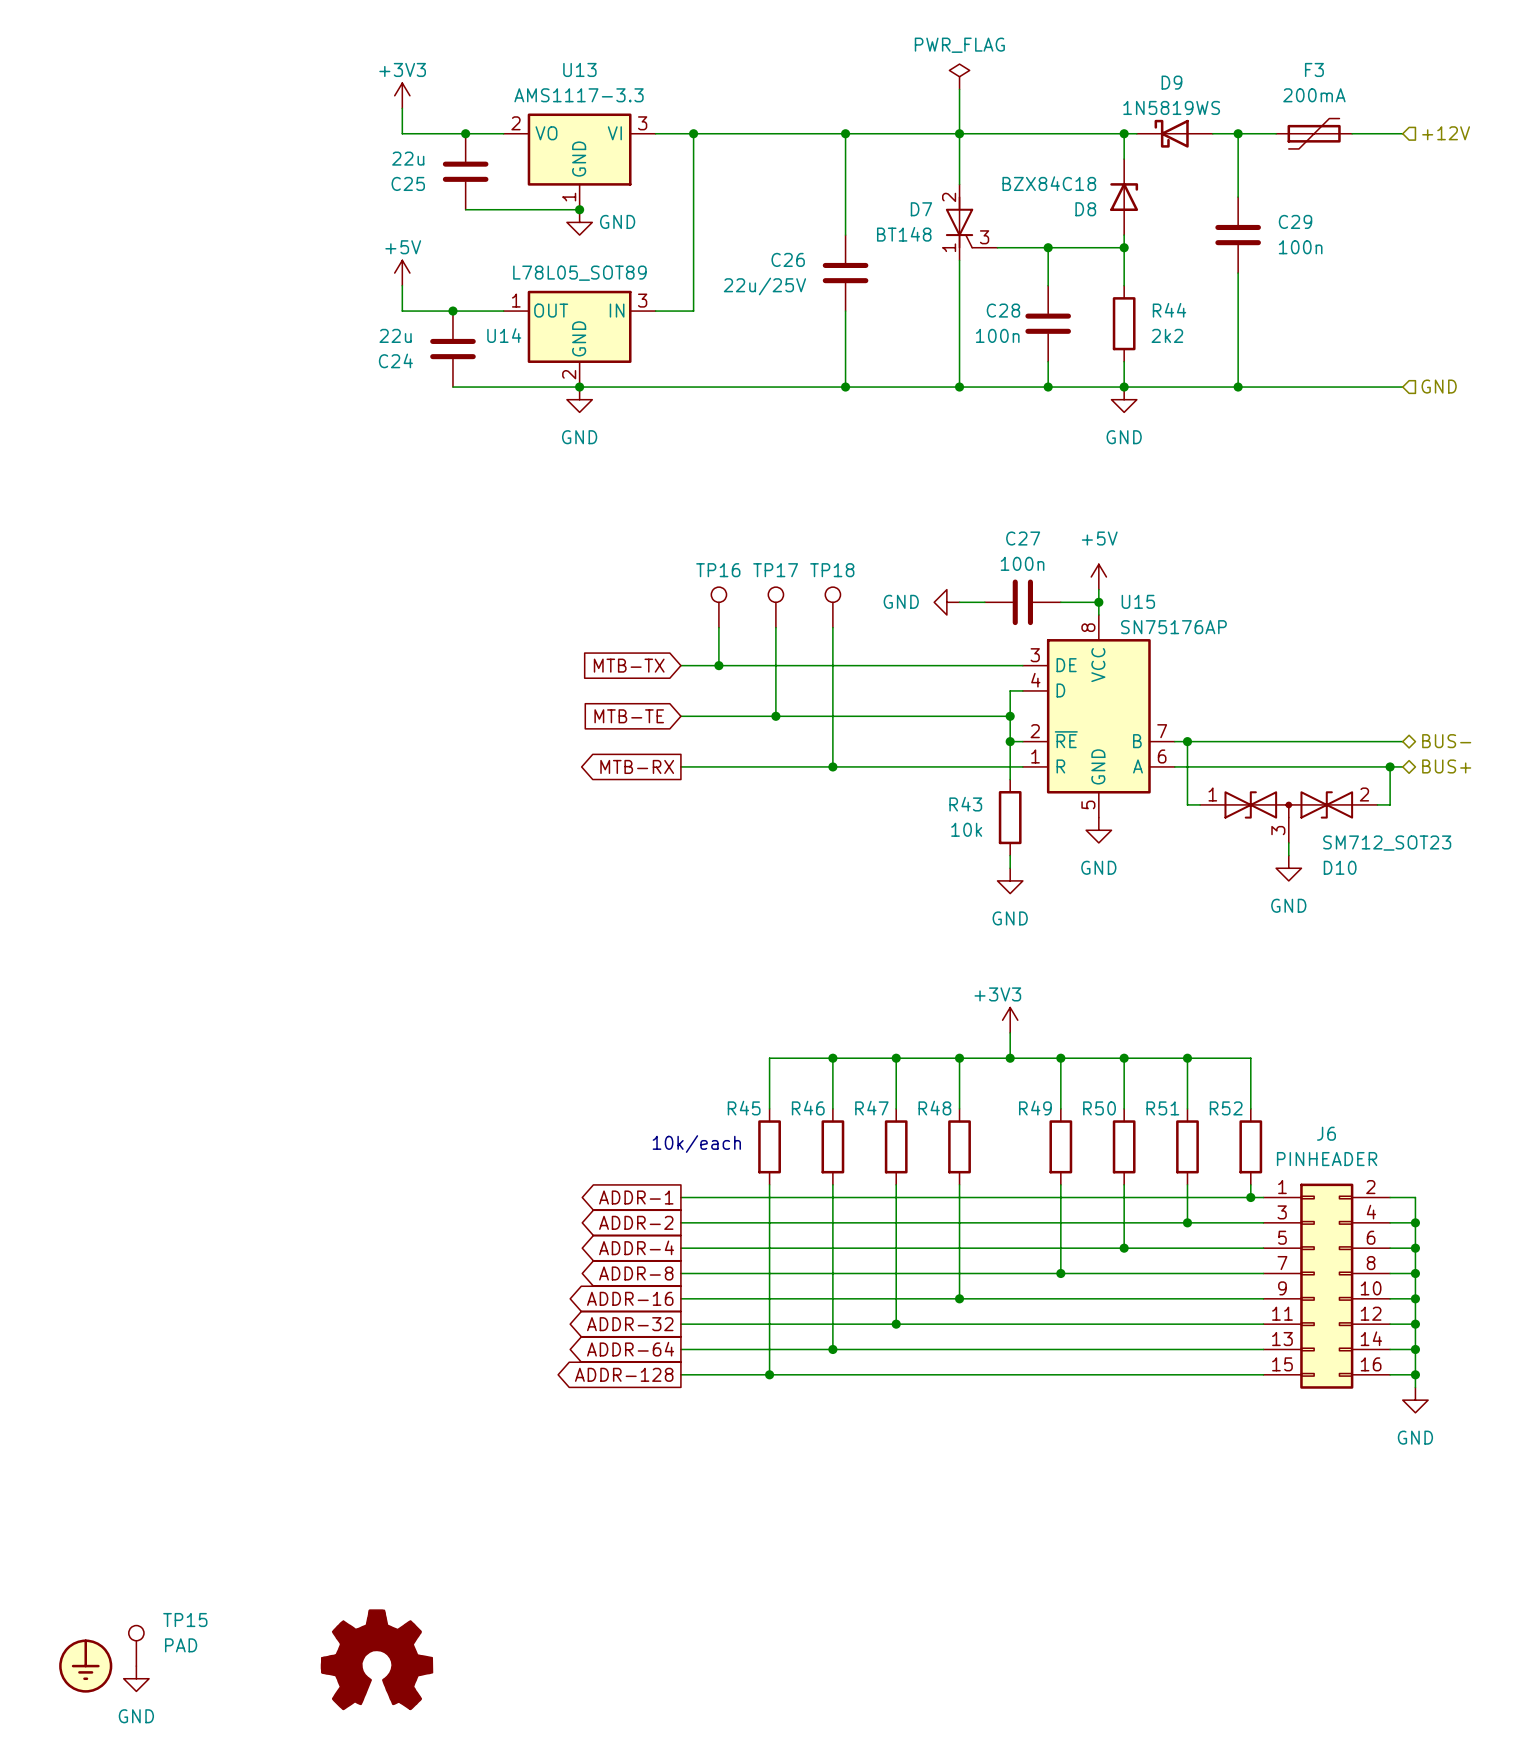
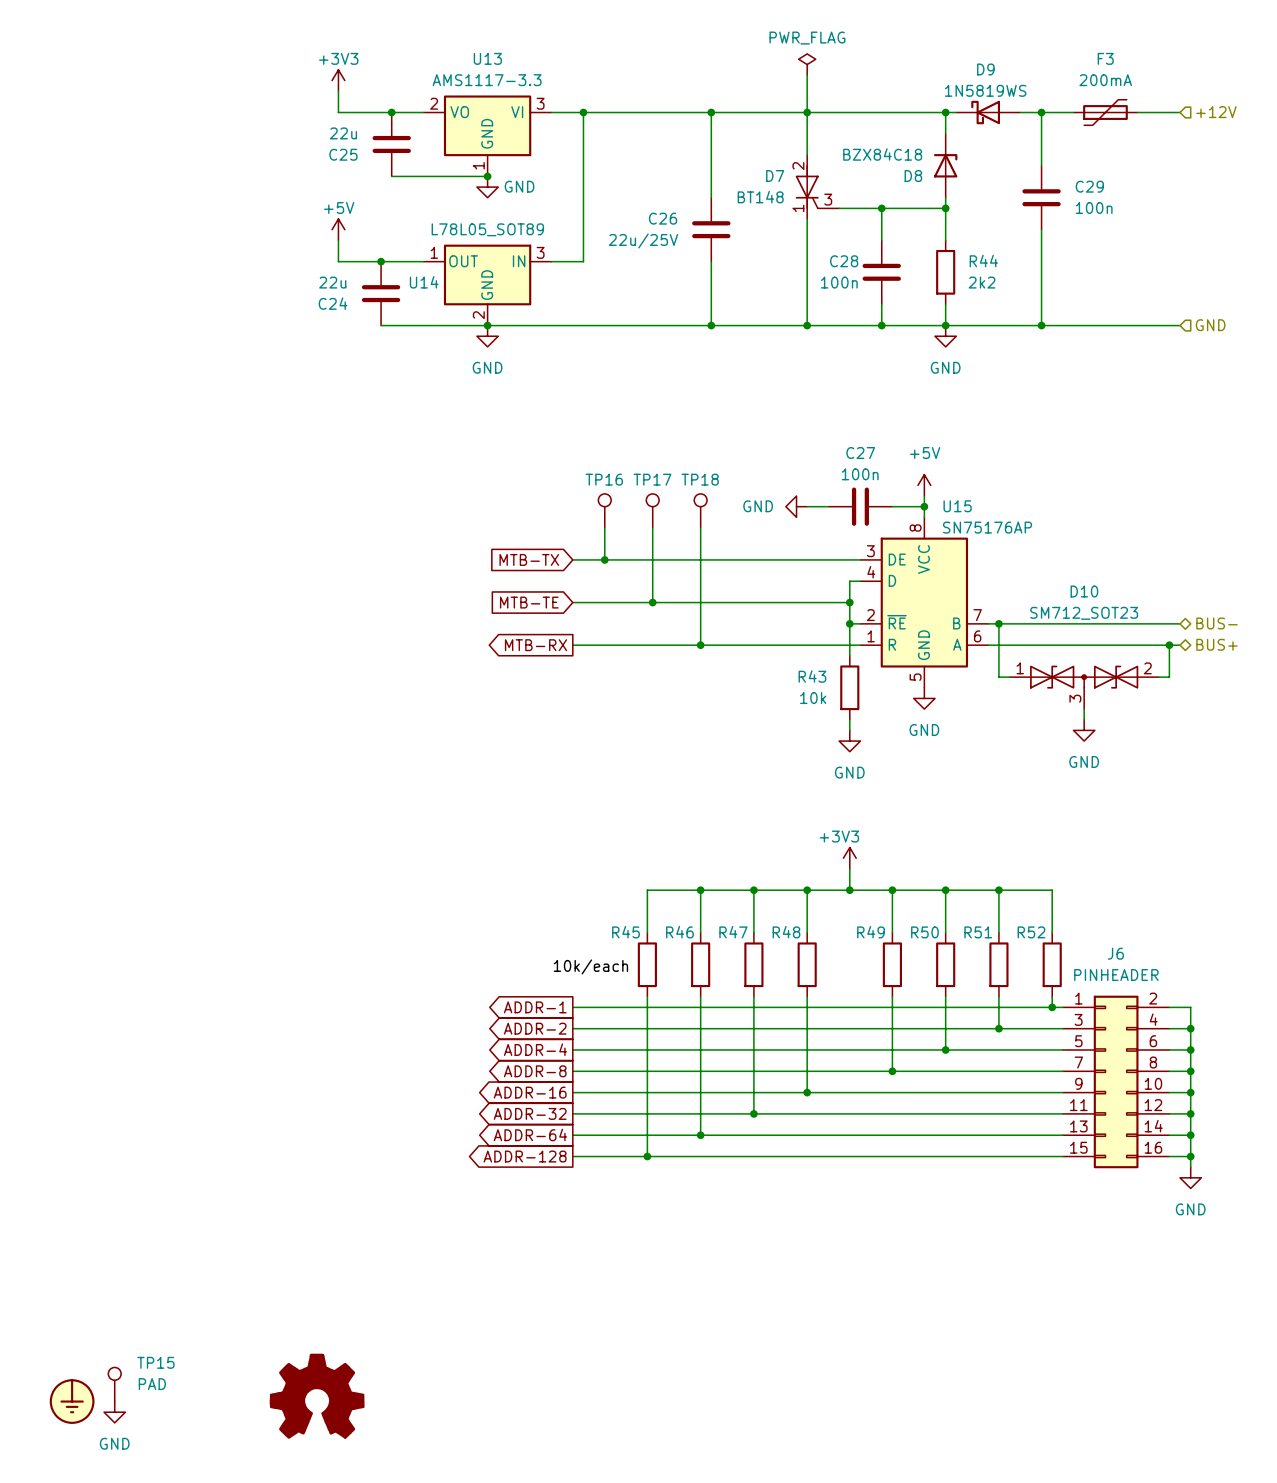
D10 value position: SM712_SOT23 (1387, 843) -> SM712_SOT23 (1084, 613)
D10 name position: D10 (1340, 867) -> D10 (1084, 591)
text: 10k/each (696, 1144) -> none
label: none -> 10k/each (590, 966)

